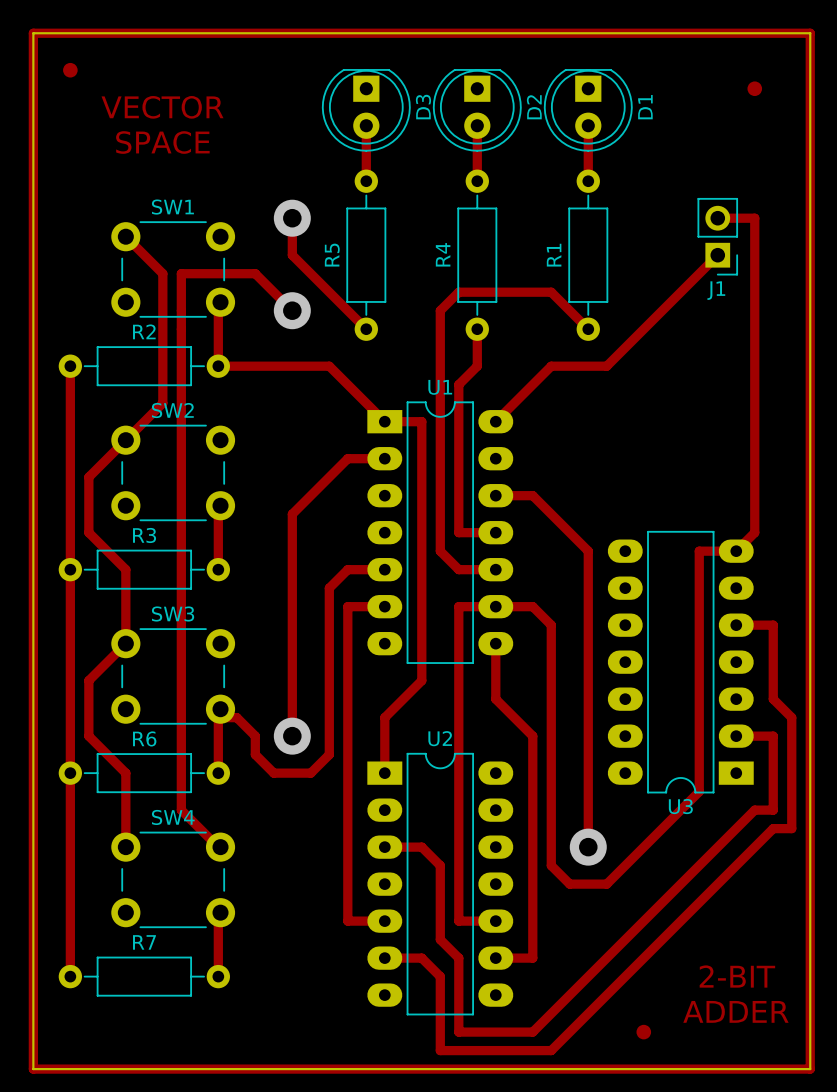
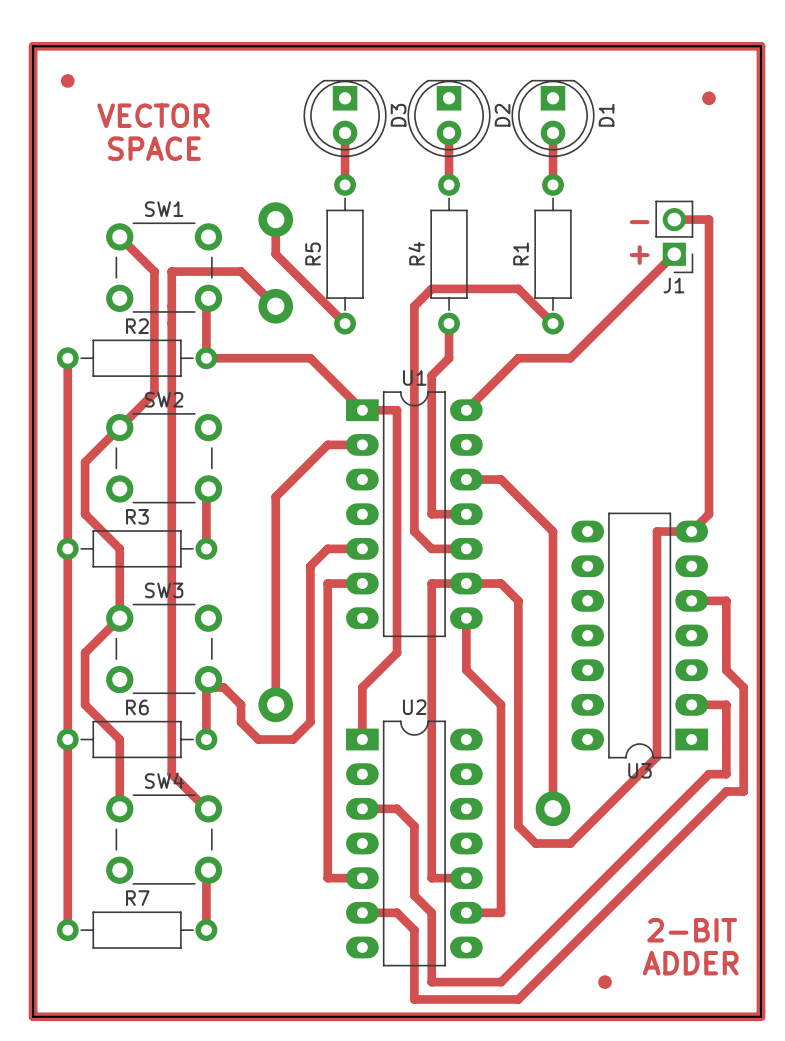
text: none -> - (639, 222)
text: none -> + (639, 255)

